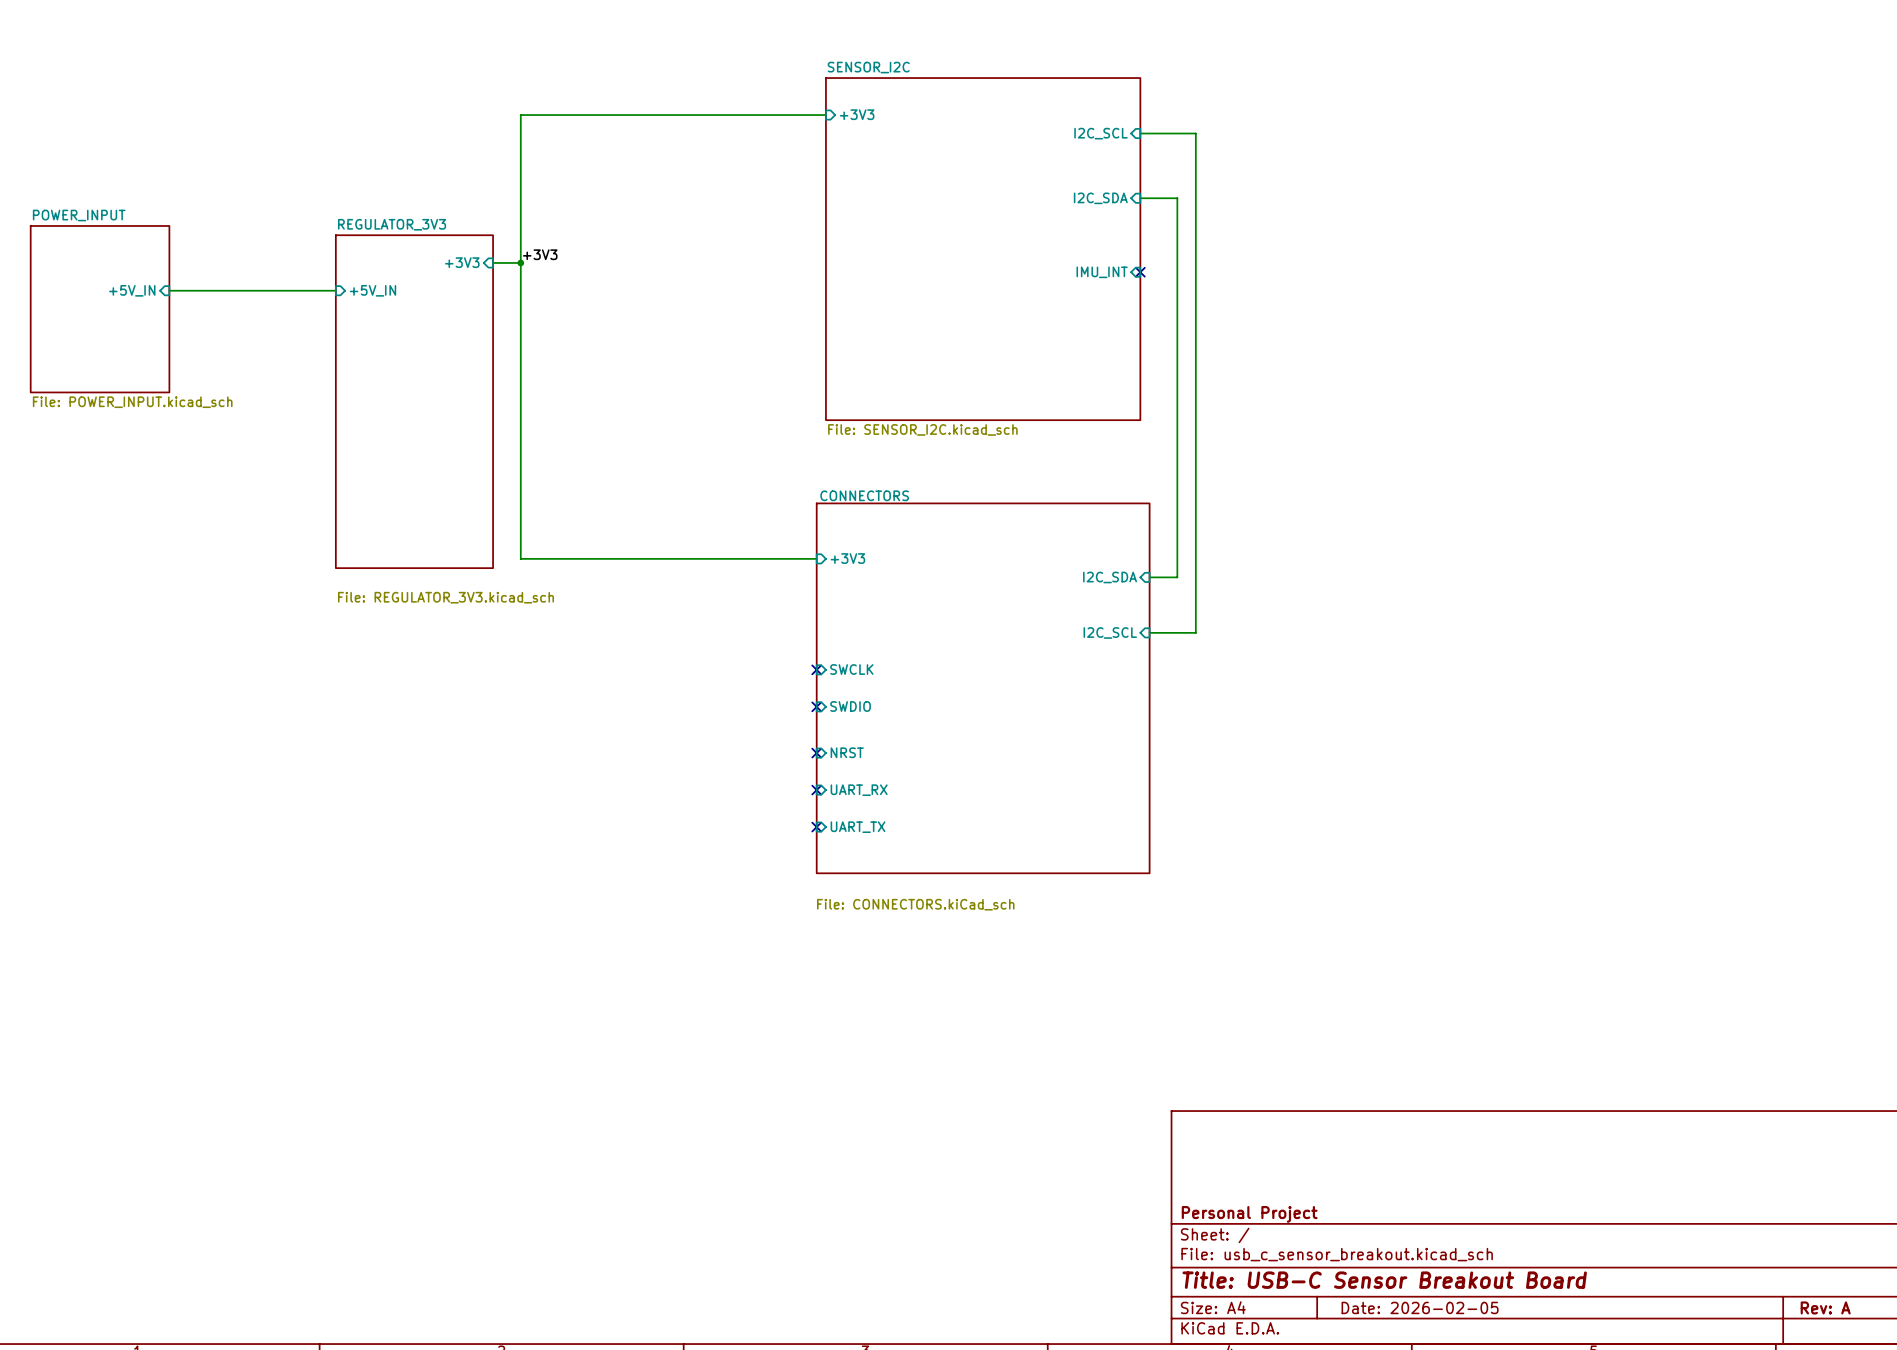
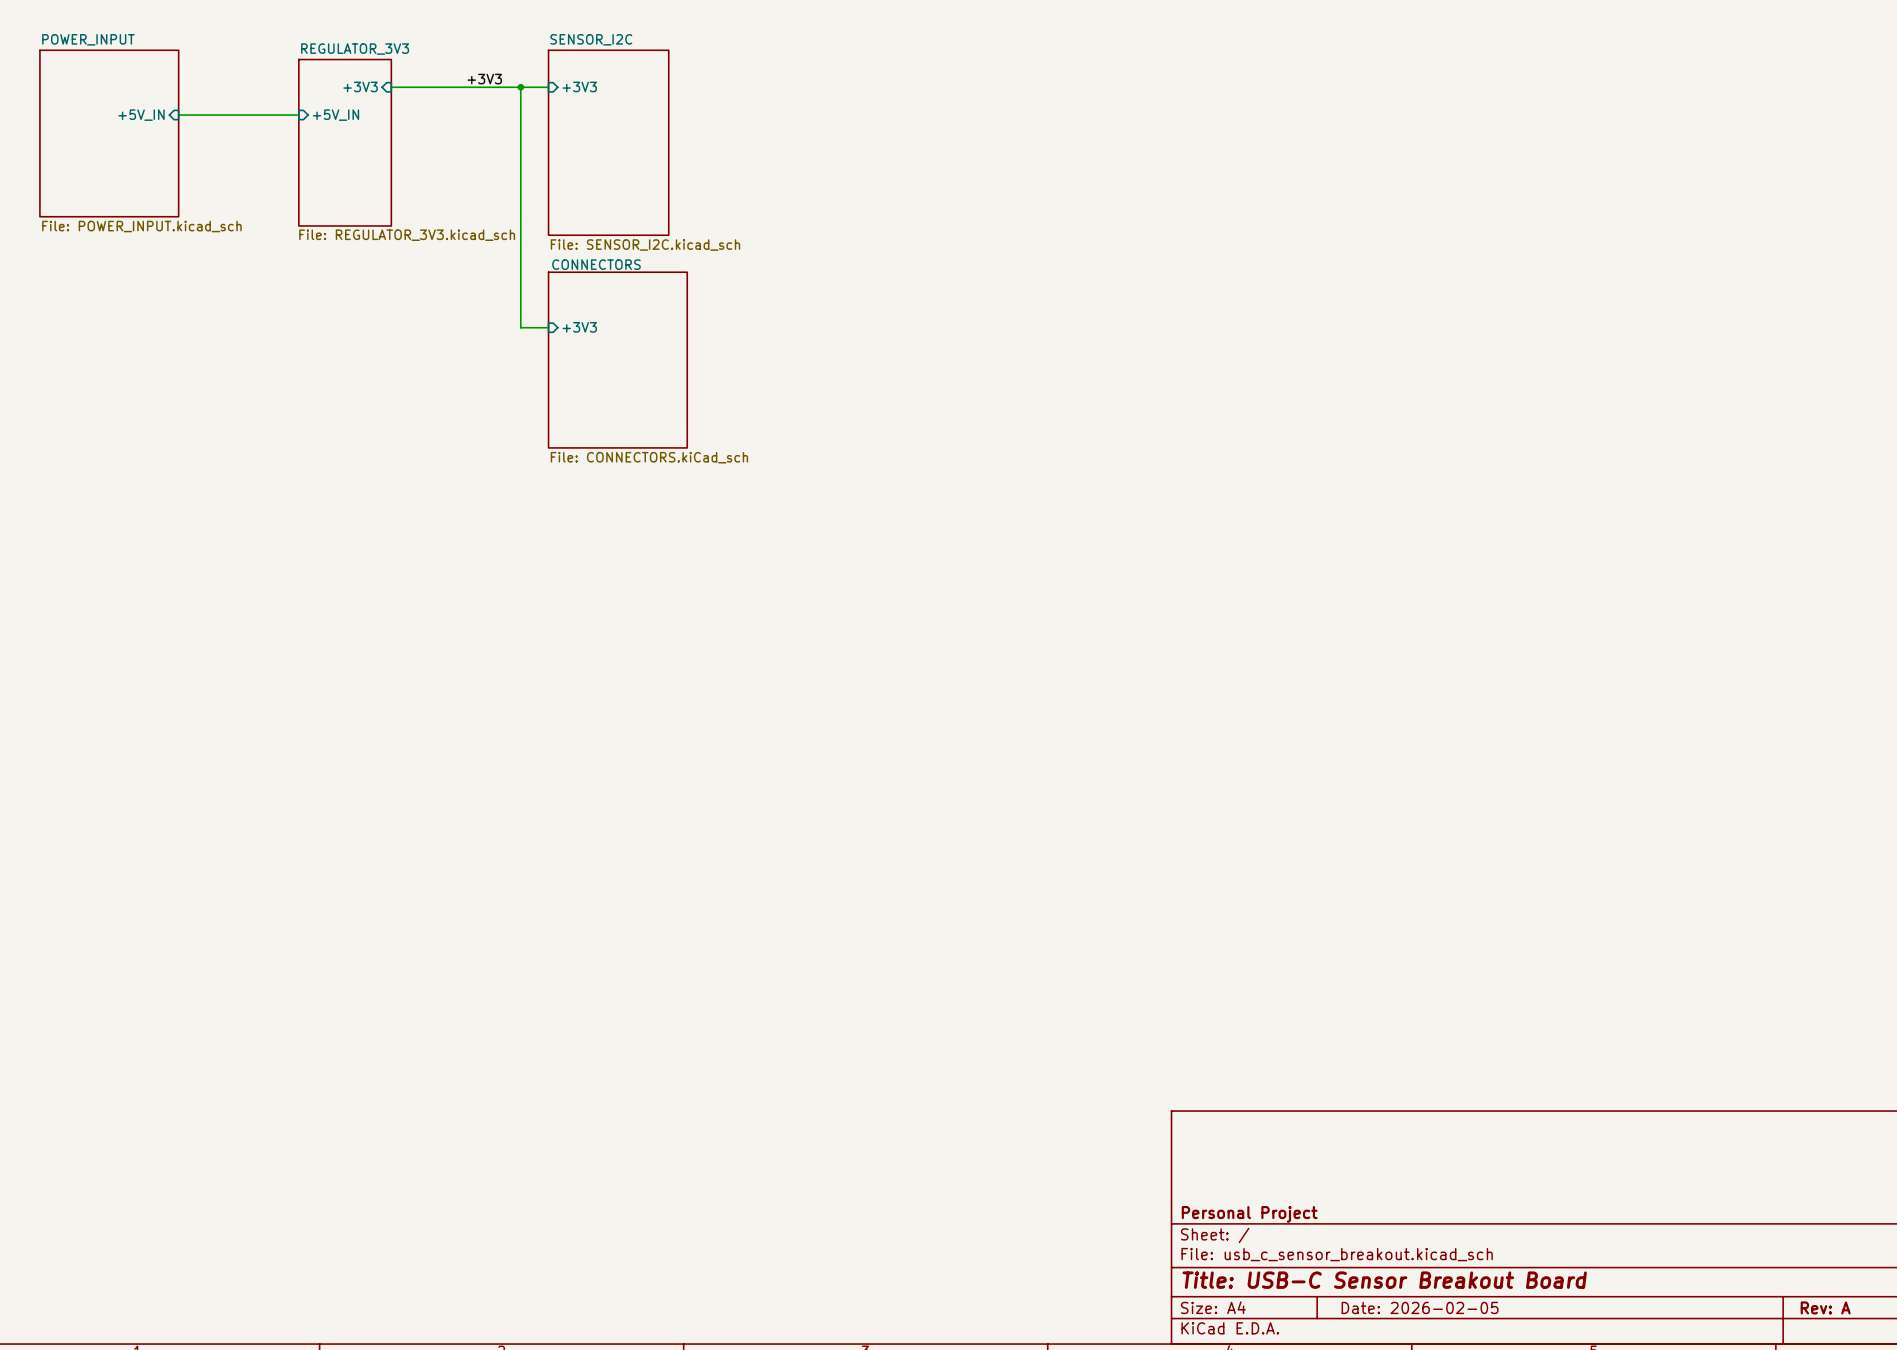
sheet SENSOR_I2C name position: SENSOR_I2C (868, 67) -> SENSOR_I2C (591, 39)
sheet SENSOR_I2C shape: [825, 77, 1141, 421] -> [547, 49, 670, 236]
label: none -> +3V3 (484, 79)
sheet pin: none -> +3V3 (360, 86)
sheet pin: none -> +3V3 (579, 86)
wire: none -> (391, 87) (548, 87)
junction: none -> (520, 87)
sheet pin: +3V3 (857, 114) -> none
sheet pin: none -> +5V_IN (141, 115)
wire: none -> (178, 115) (298, 115)
sheet pin: none -> +5V_IN (335, 115)
wire: (520, 115) (825, 115) -> (520, 115) (520, 87)
sheet pin: I2C_SCL (1101, 133) -> none
wire: (1140, 133) (1195, 133) (1195, 632) (1149, 632) -> none
sheet pin: I2C_SDA (1100, 198) -> none
wire: (1140, 198) (1177, 198) (1177, 577) (1149, 577) -> none
sheet REGULATOR_3V3 name position: REGULATOR_3V3 (392, 224) -> REGULATOR_3V3 (355, 49)
sheet REGULATOR_3V3 shape: [335, 234, 494, 569] -> [298, 58, 392, 227]
label: +3V3 (540, 254) -> none
sheet pin: +3V3 (462, 262) -> none
wire: (493, 262) (520, 262) -> none
junction: (520, 262) -> none
sheet pin: IMU_INT (1102, 272) -> none
no-connect mark: (1140, 272) -> none
sheet pin: +5V_IN (132, 290) -> none
wire: (169, 290) (335, 290) -> none
sheet pin: +5V_IN (372, 290) -> none
sheet POWER_INPUT position: (100, 309) -> (109, 133)
wire: (520, 327) (520, 558) (816, 558) -> (520, 327) (548, 327)
sheet pin: none -> +3V3 (579, 327)
sheet CONNECTORS: none -> File: CONNECTORS.kiCad_sch (617, 360)
sheet SENSOR_I2C value position: File: SENSOR_I2C.kicad_sch (922, 429) -> File: SENSOR_I2C.kicad_sch (645, 245)
sheet pin: +3V3 (847, 558) -> none
sheet pin: I2C_SDA (1110, 577) -> none
sheet REGULATOR_3V3 value position: File: REGULATOR_3V3.kicad_sch (446, 597) -> File: REGULATOR_3V3.kicad_sch (407, 235)
sheet pin: I2C_SCL (1110, 632) -> none
no-connect mark: (816, 669) -> none
sheet pin: SWCLK (851, 669) -> none
sheet CONNECTORS: File: CONNECTORS.kiCad_sch (983, 688) -> none
no-connect mark: (816, 706) -> none
sheet pin: SWDIO (850, 706) -> none
sheet pin: NRST (847, 752) -> none
no-connect mark: (816, 753) -> none
no-connect mark: (816, 790) -> none
sheet pin: UART_RX (859, 790) -> none
no-connect mark: (816, 827) -> none
sheet pin: UART_TX (858, 827) -> none

